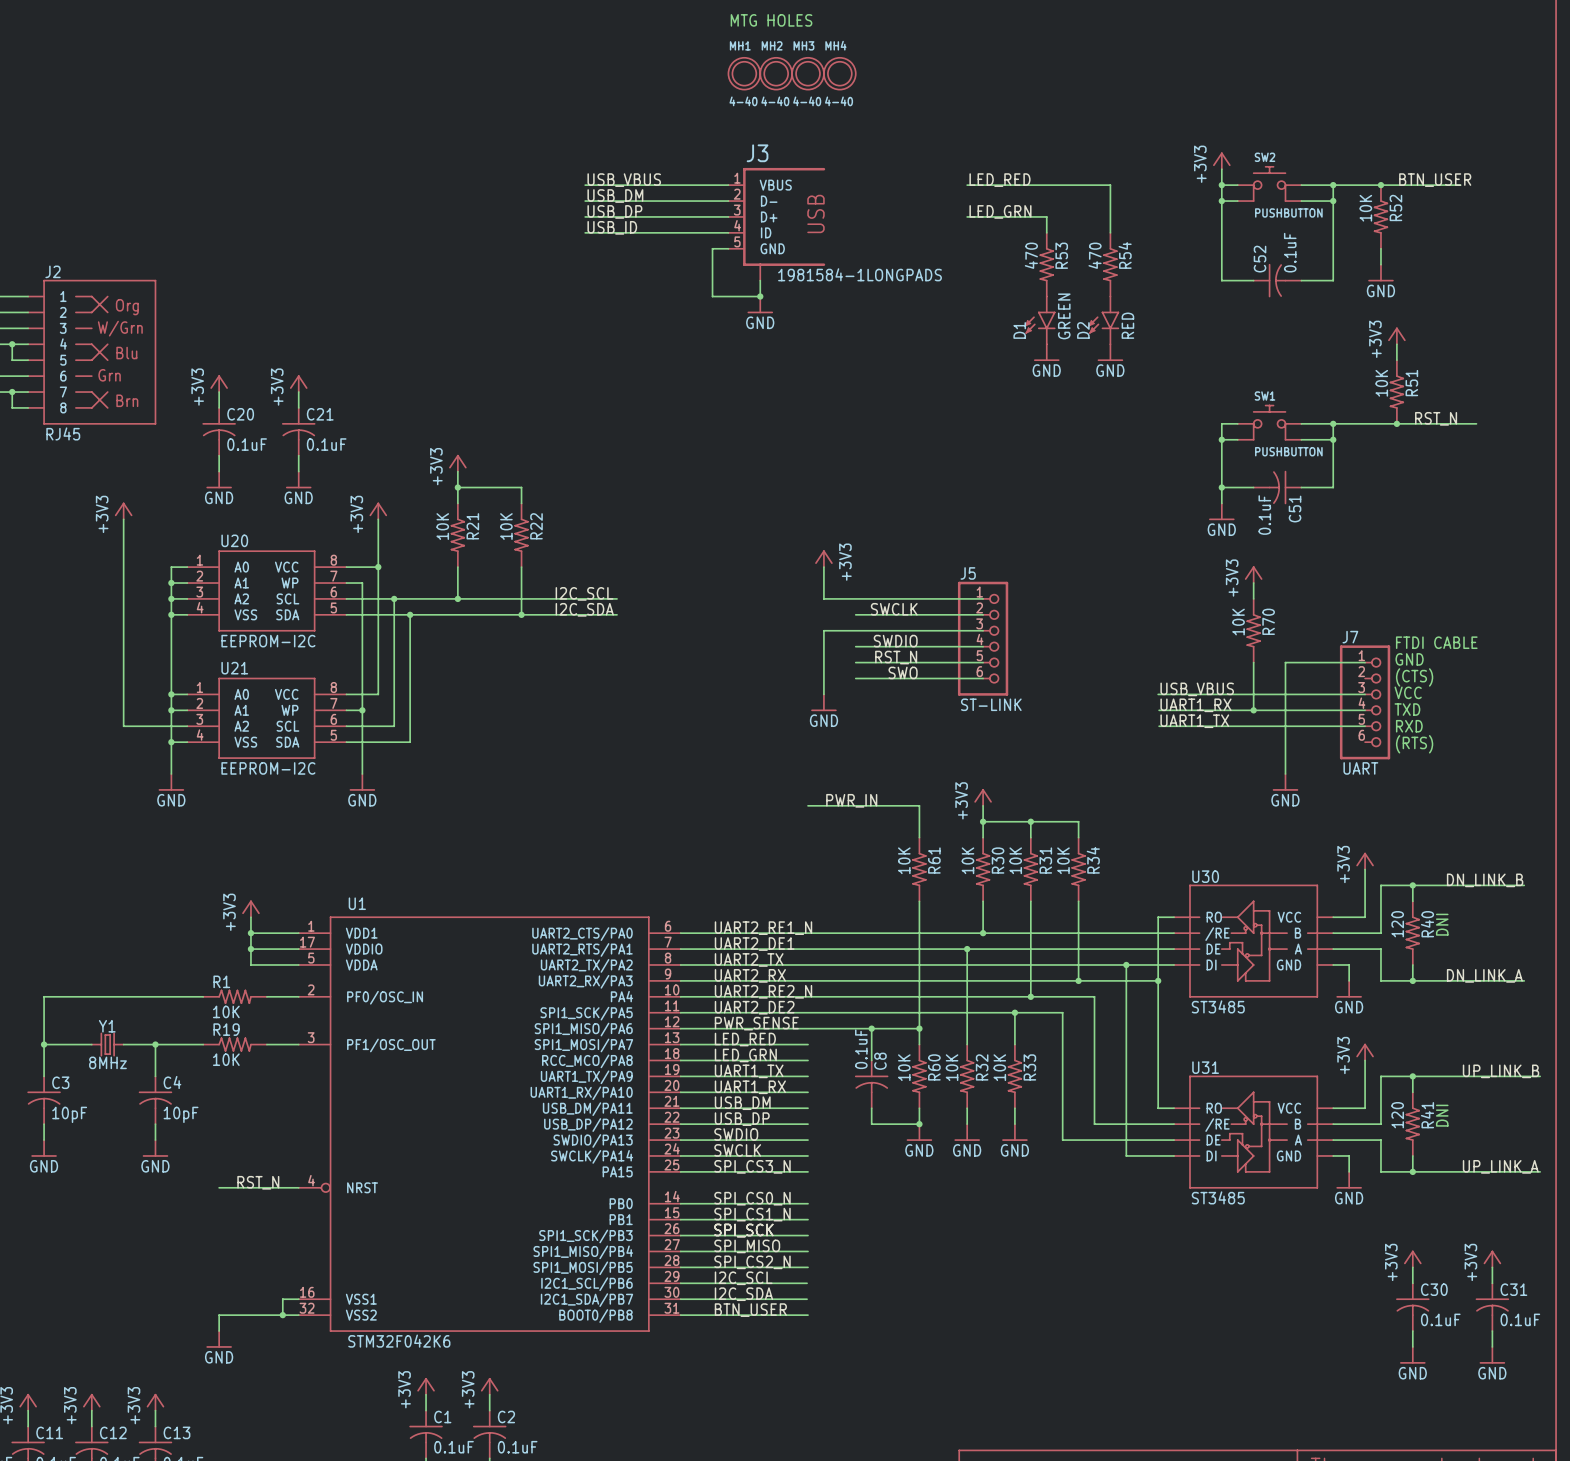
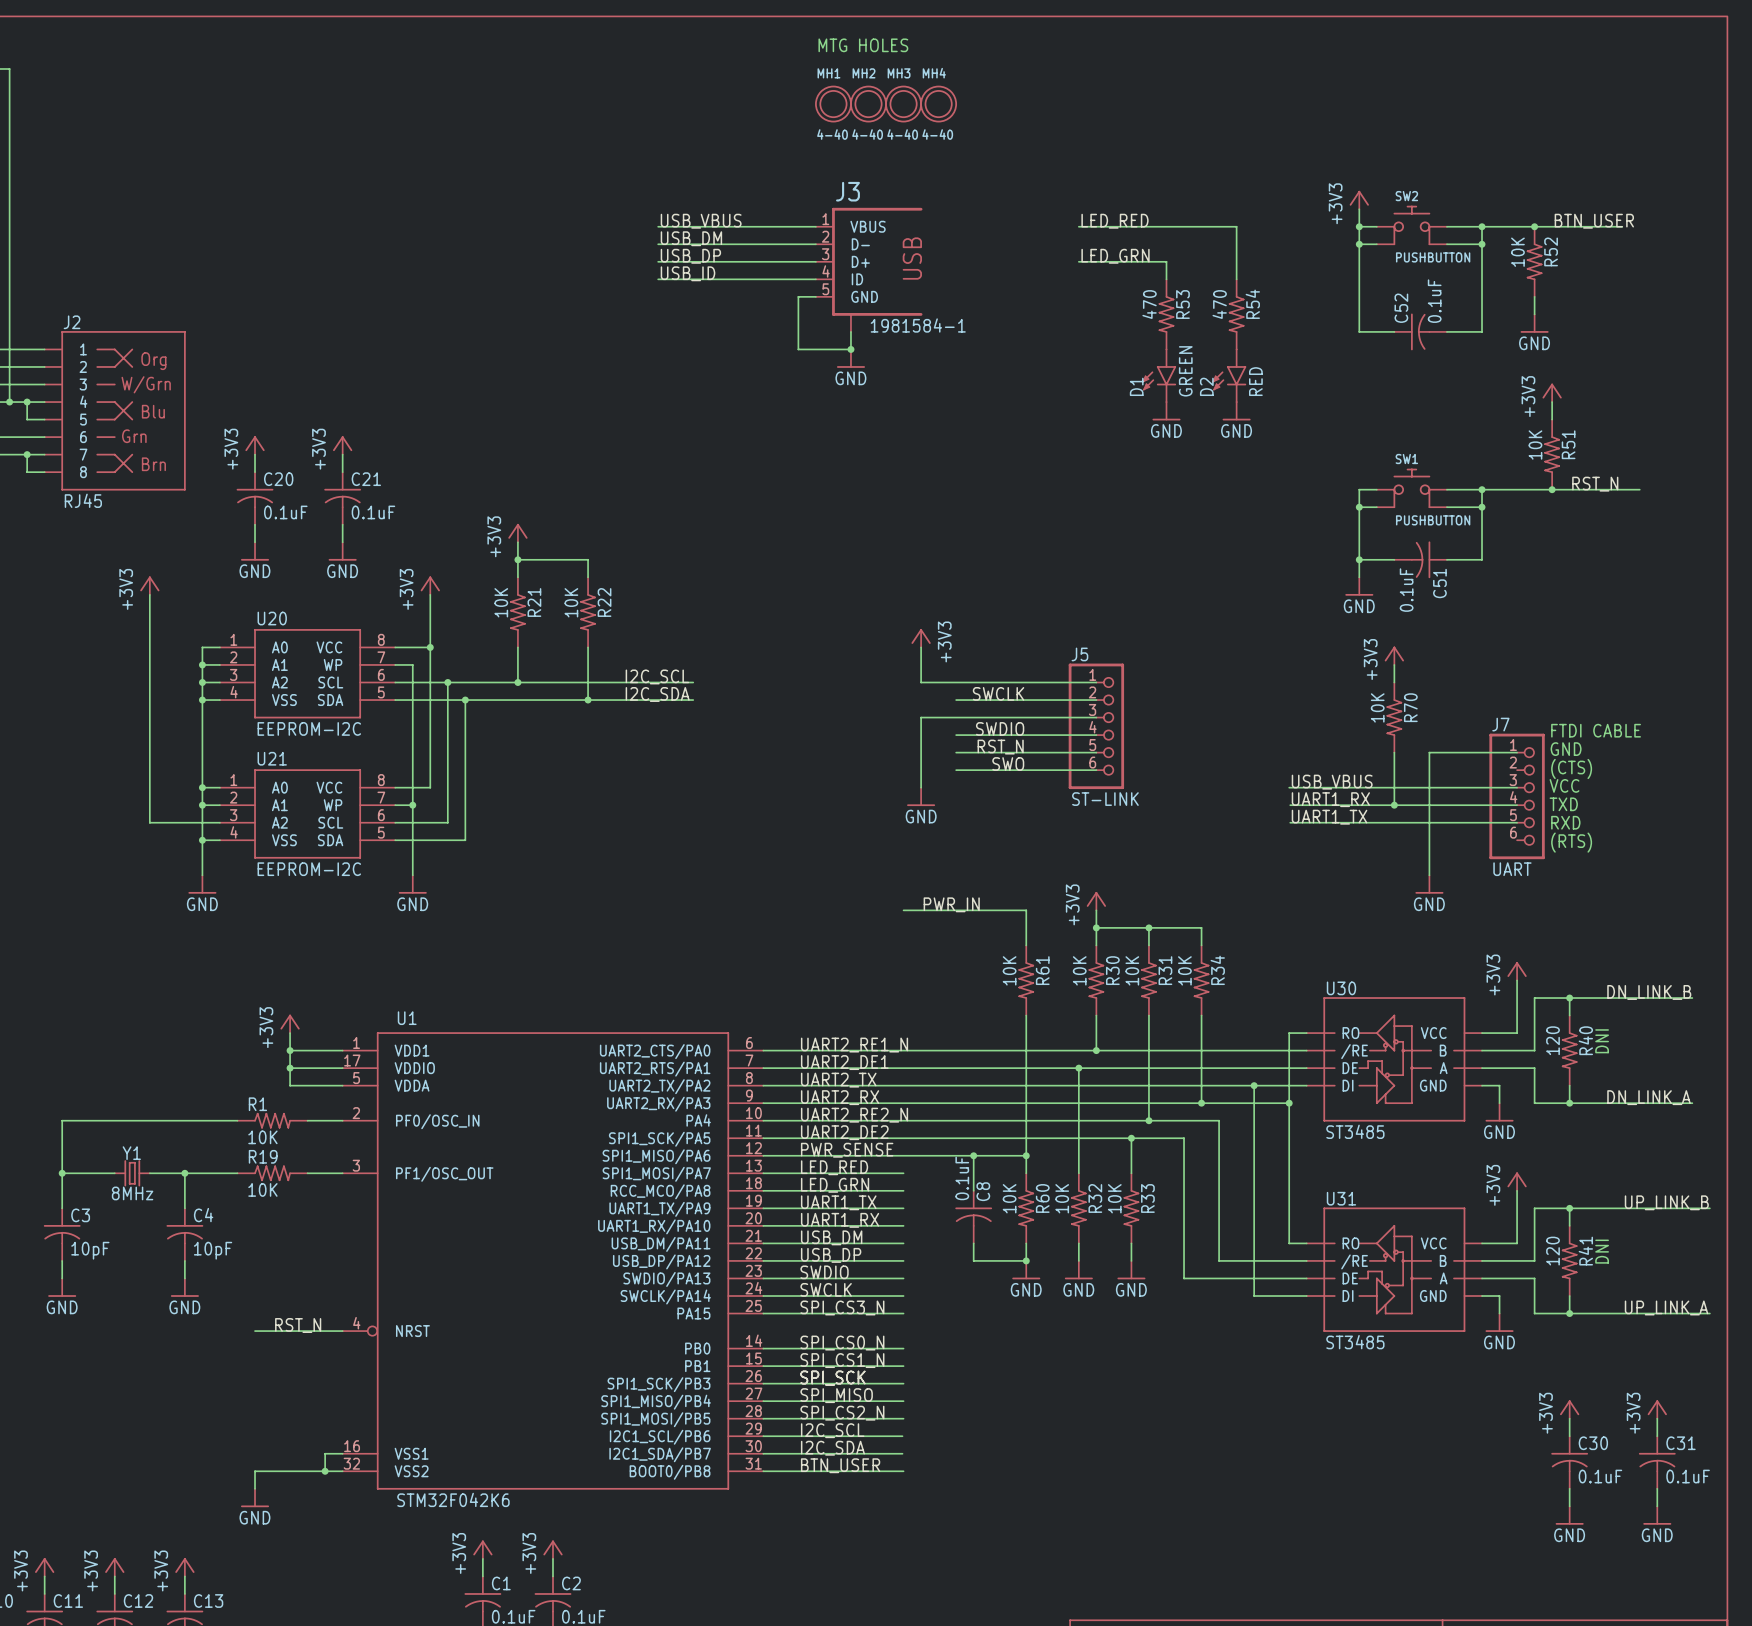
J3 value: 1981584-1LONGPADS (860, 274) -> 1981584-1 (918, 325)

